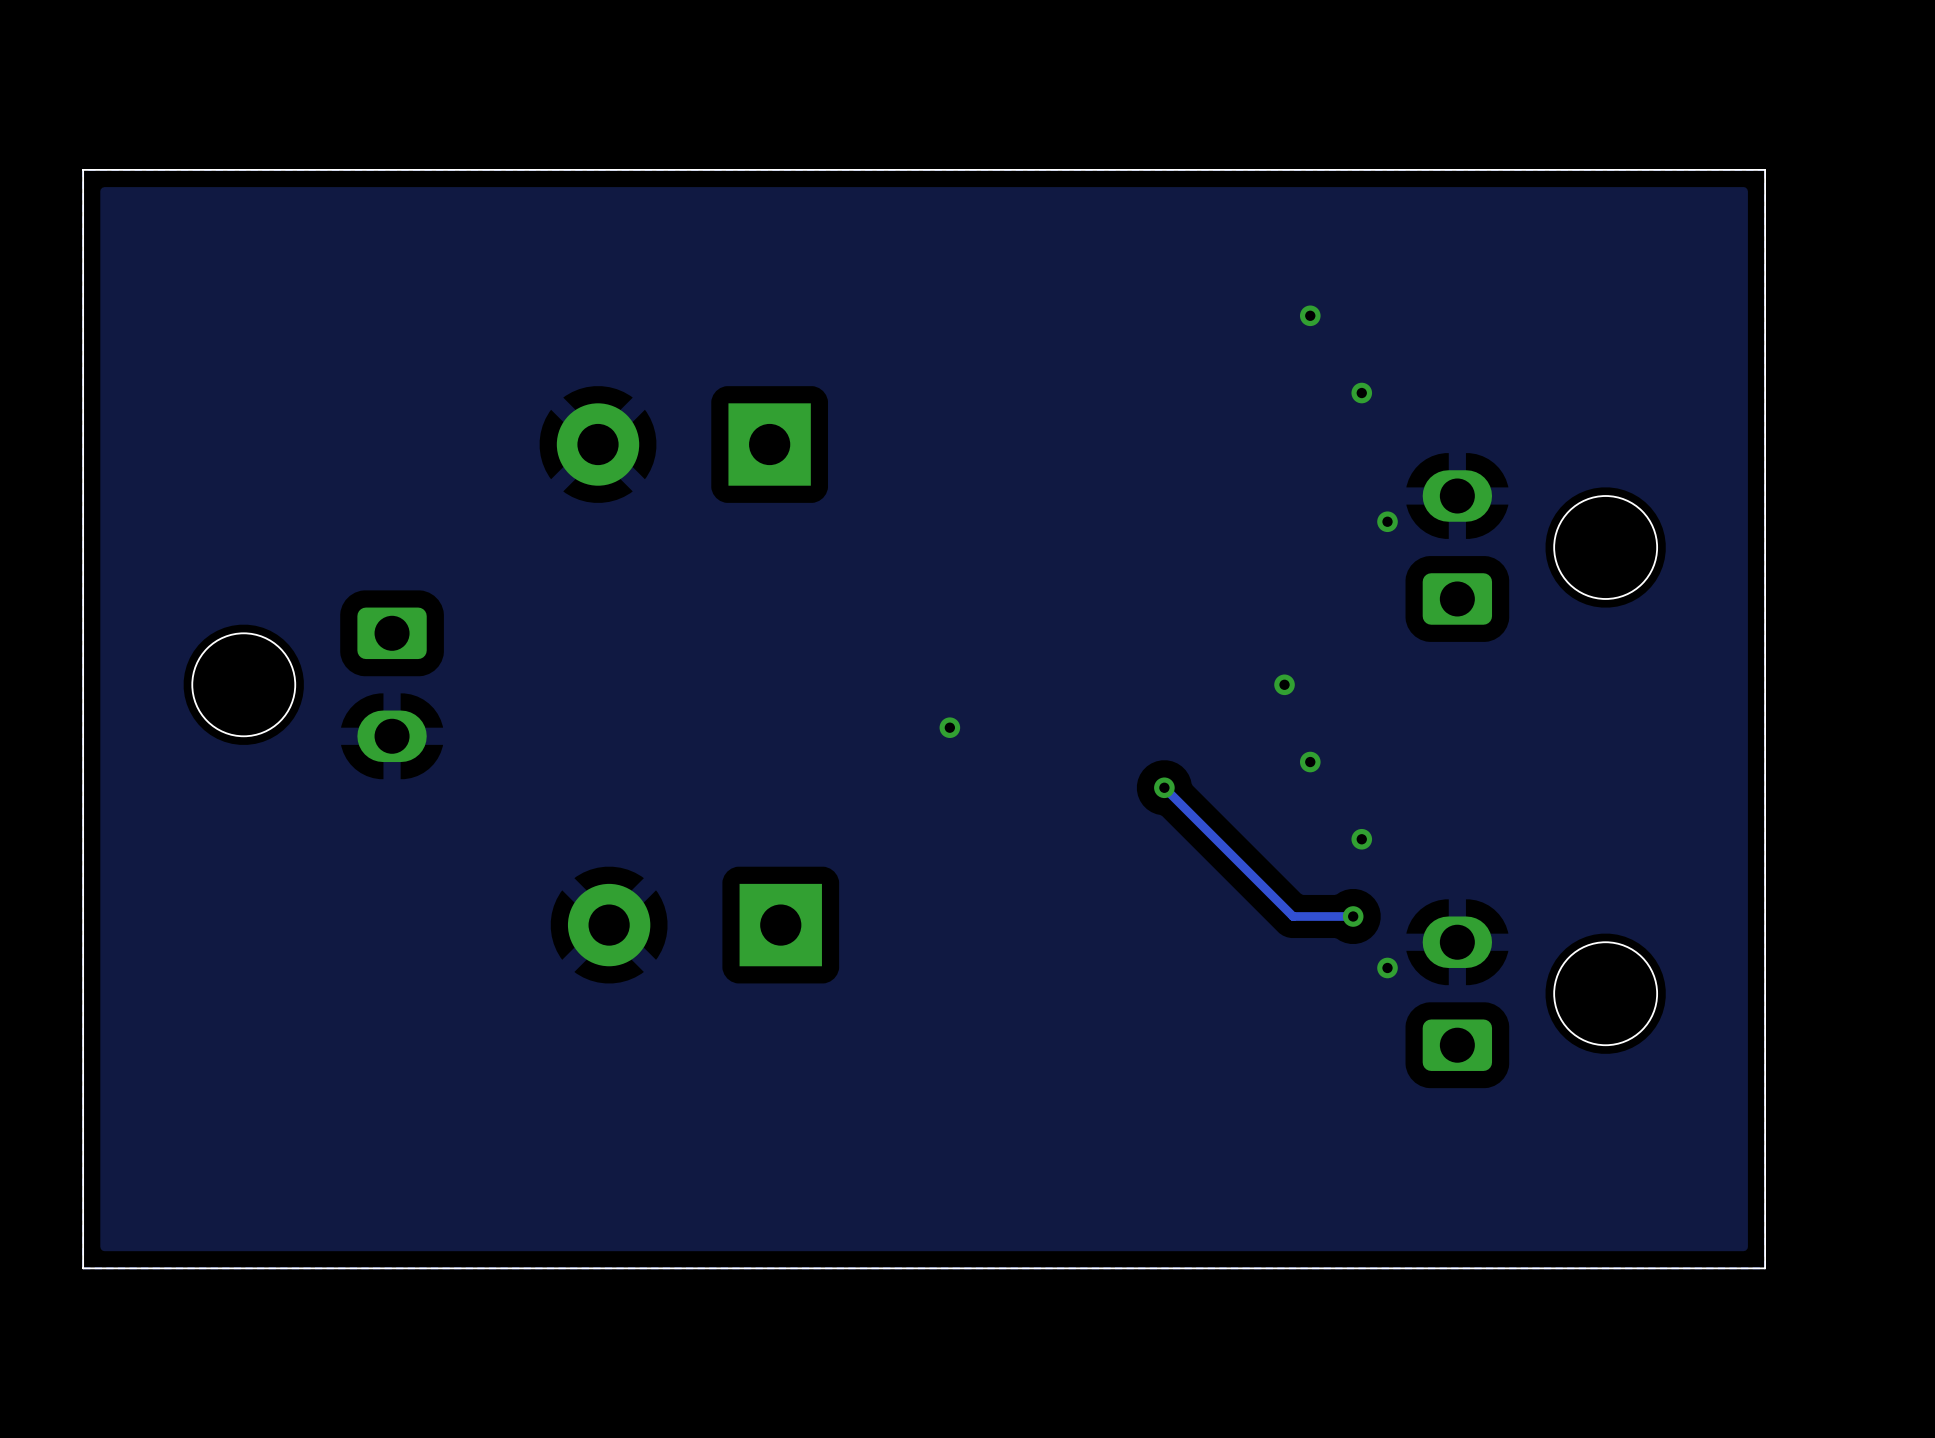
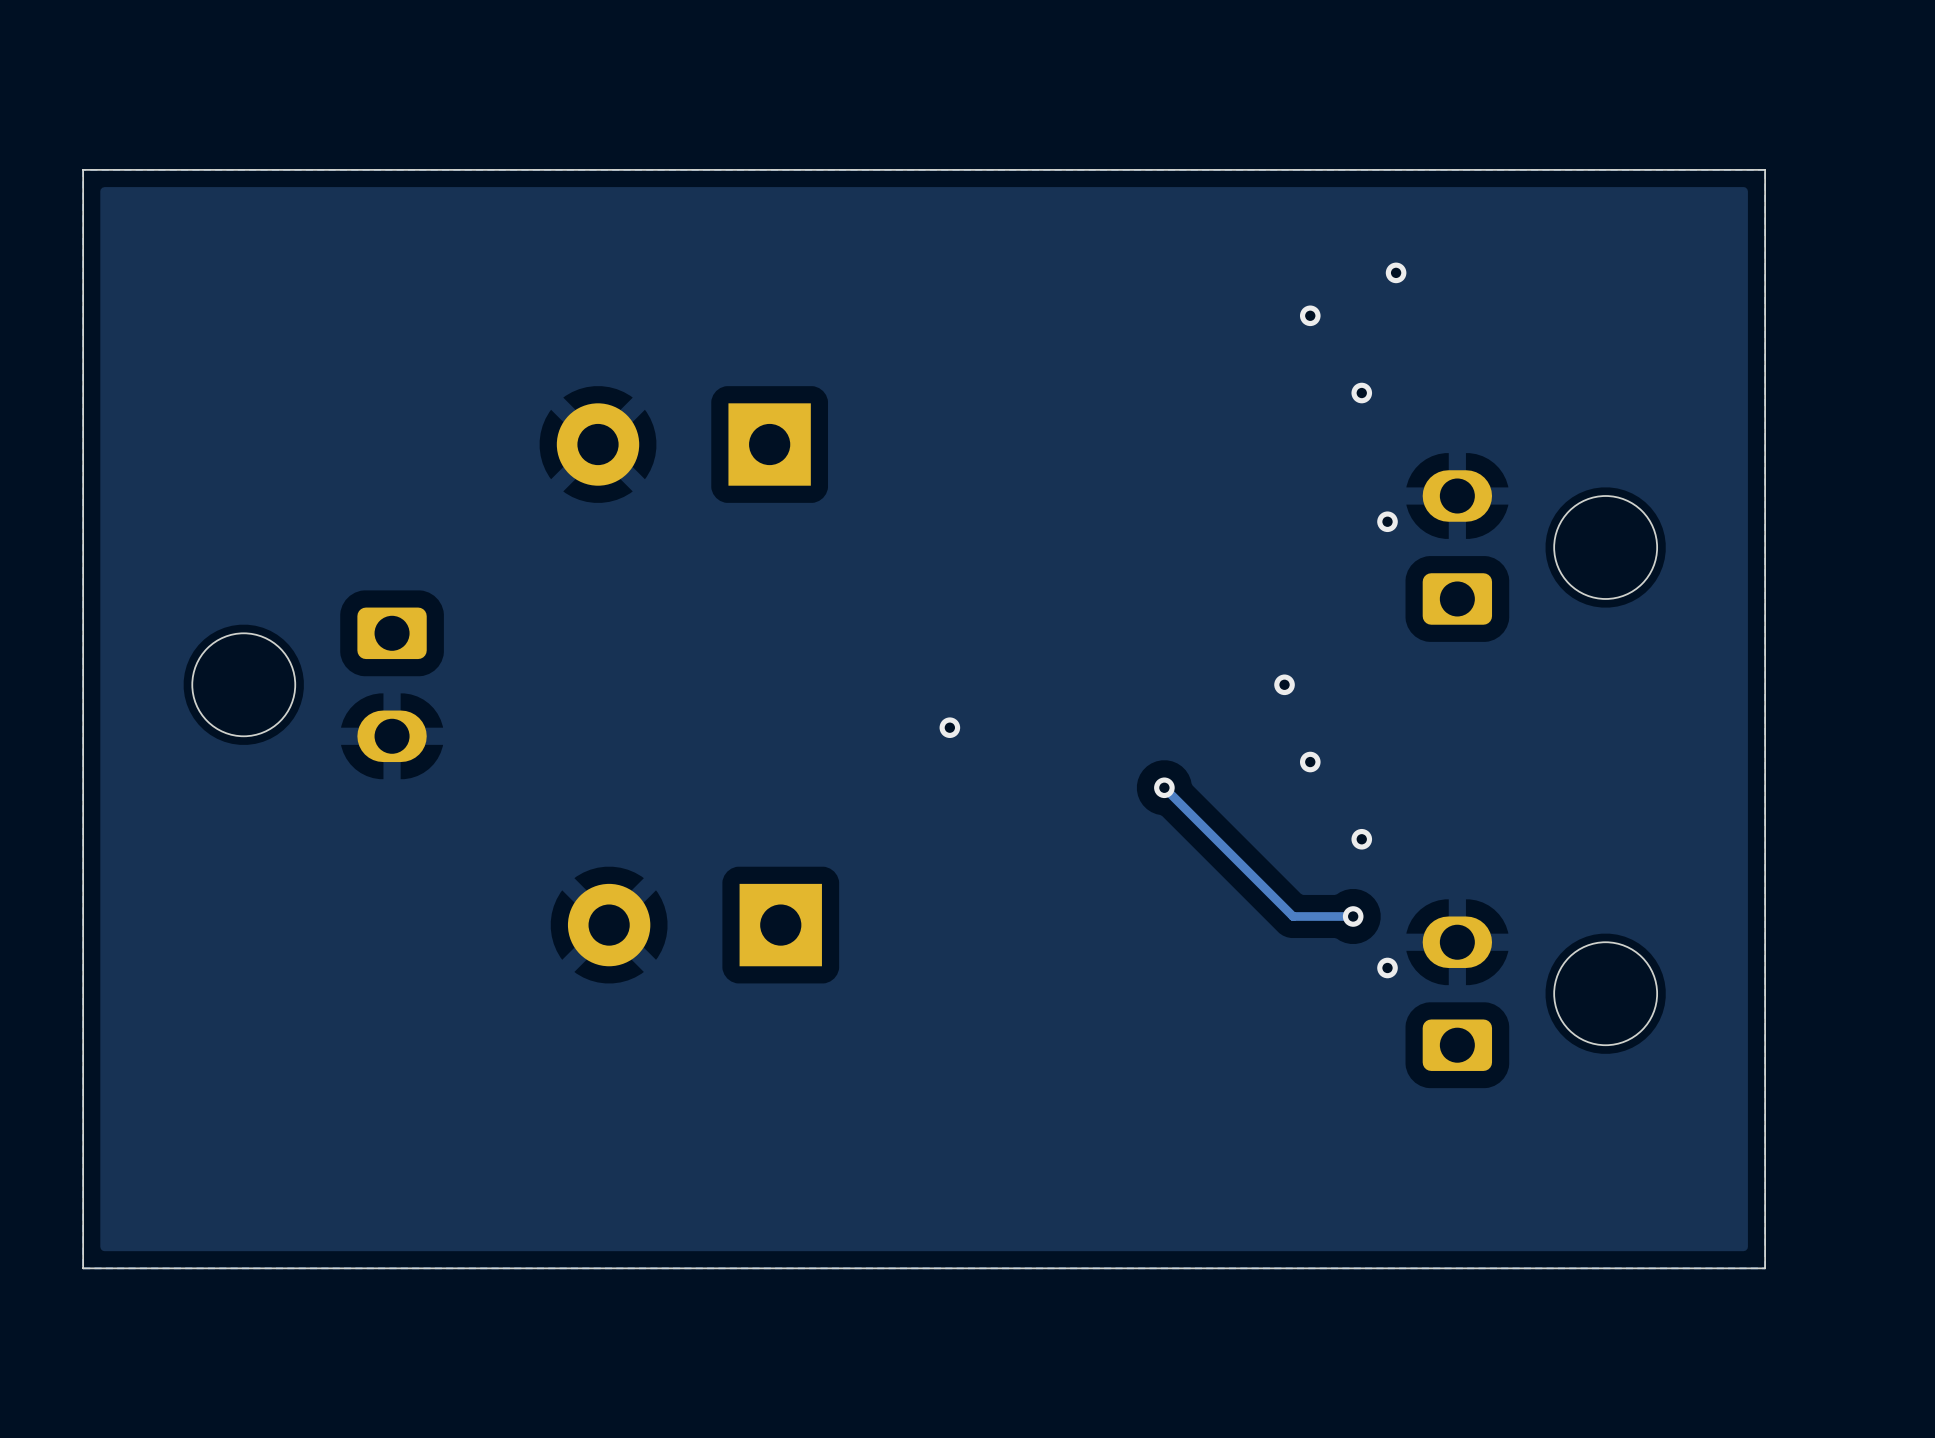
via: none -> (1396, 272)

